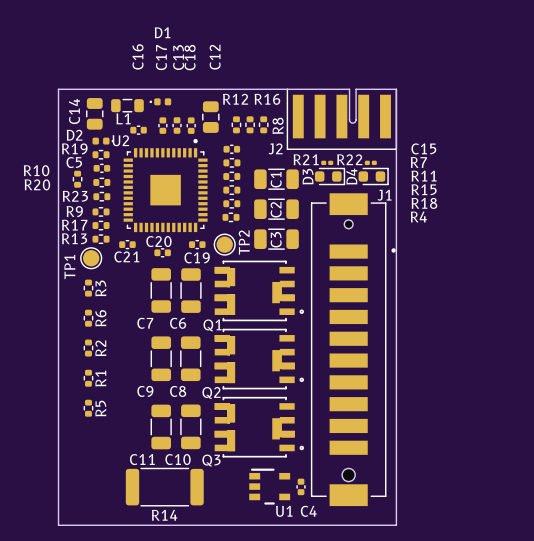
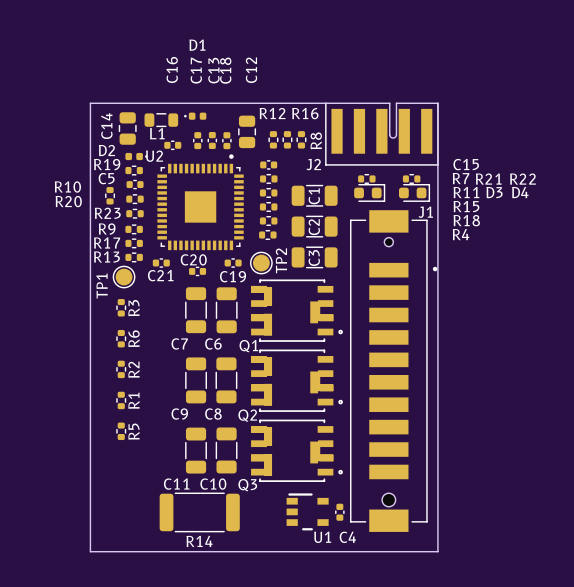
R21 name position: R21 (306, 159) -> R21 (488, 179)
R22 name position: R22 (349, 159) -> R22 (522, 179)
R21 footprint: [321, 160, 334, 166] -> [358, 174, 376, 184]
R22 footprint: [364, 160, 377, 166] -> [402, 174, 421, 184]
D3 name rotation: 0° (308, 176) -> 90° clockwise (494, 192)
D3 name position: D3 (308, 176) -> D3 (494, 192)
D4 name rotation: 0° (351, 176) -> 90° clockwise (520, 192)
D4 name position: D4 (351, 176) -> D4 (520, 192)

